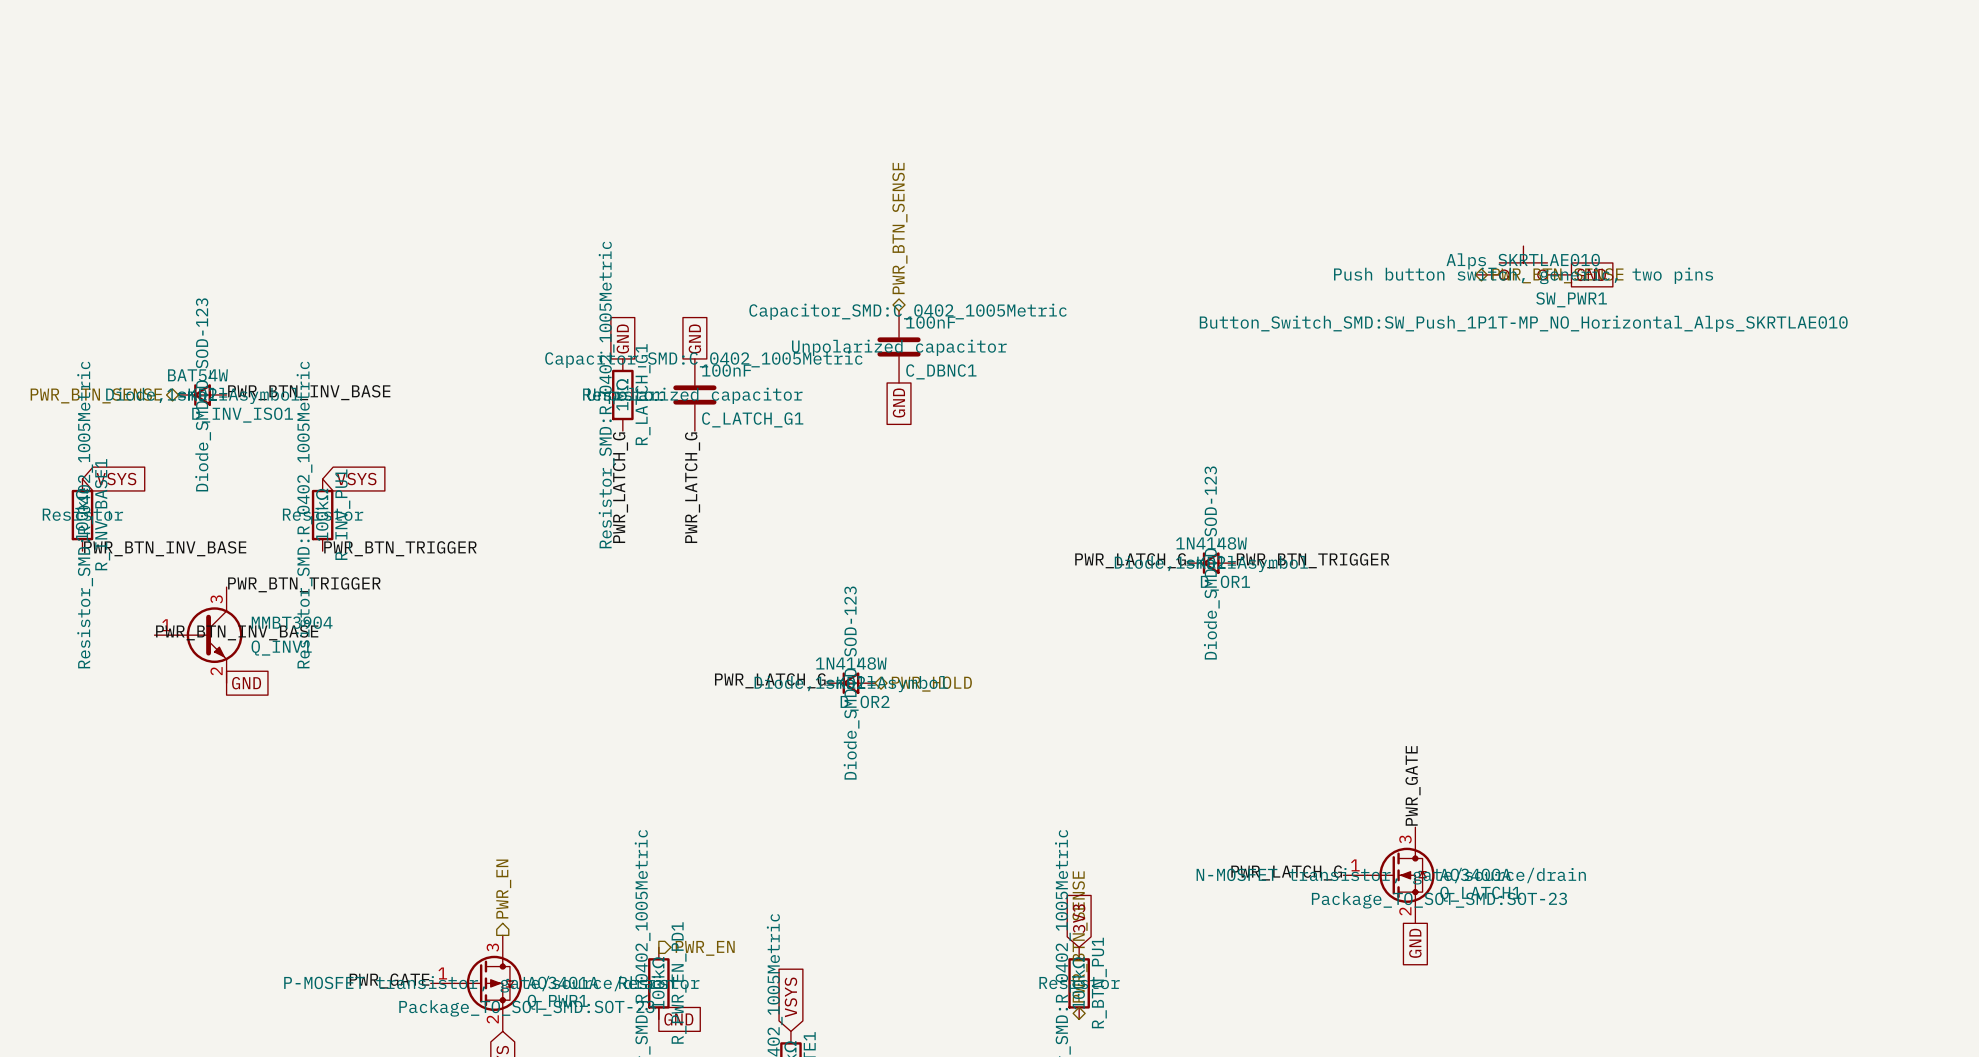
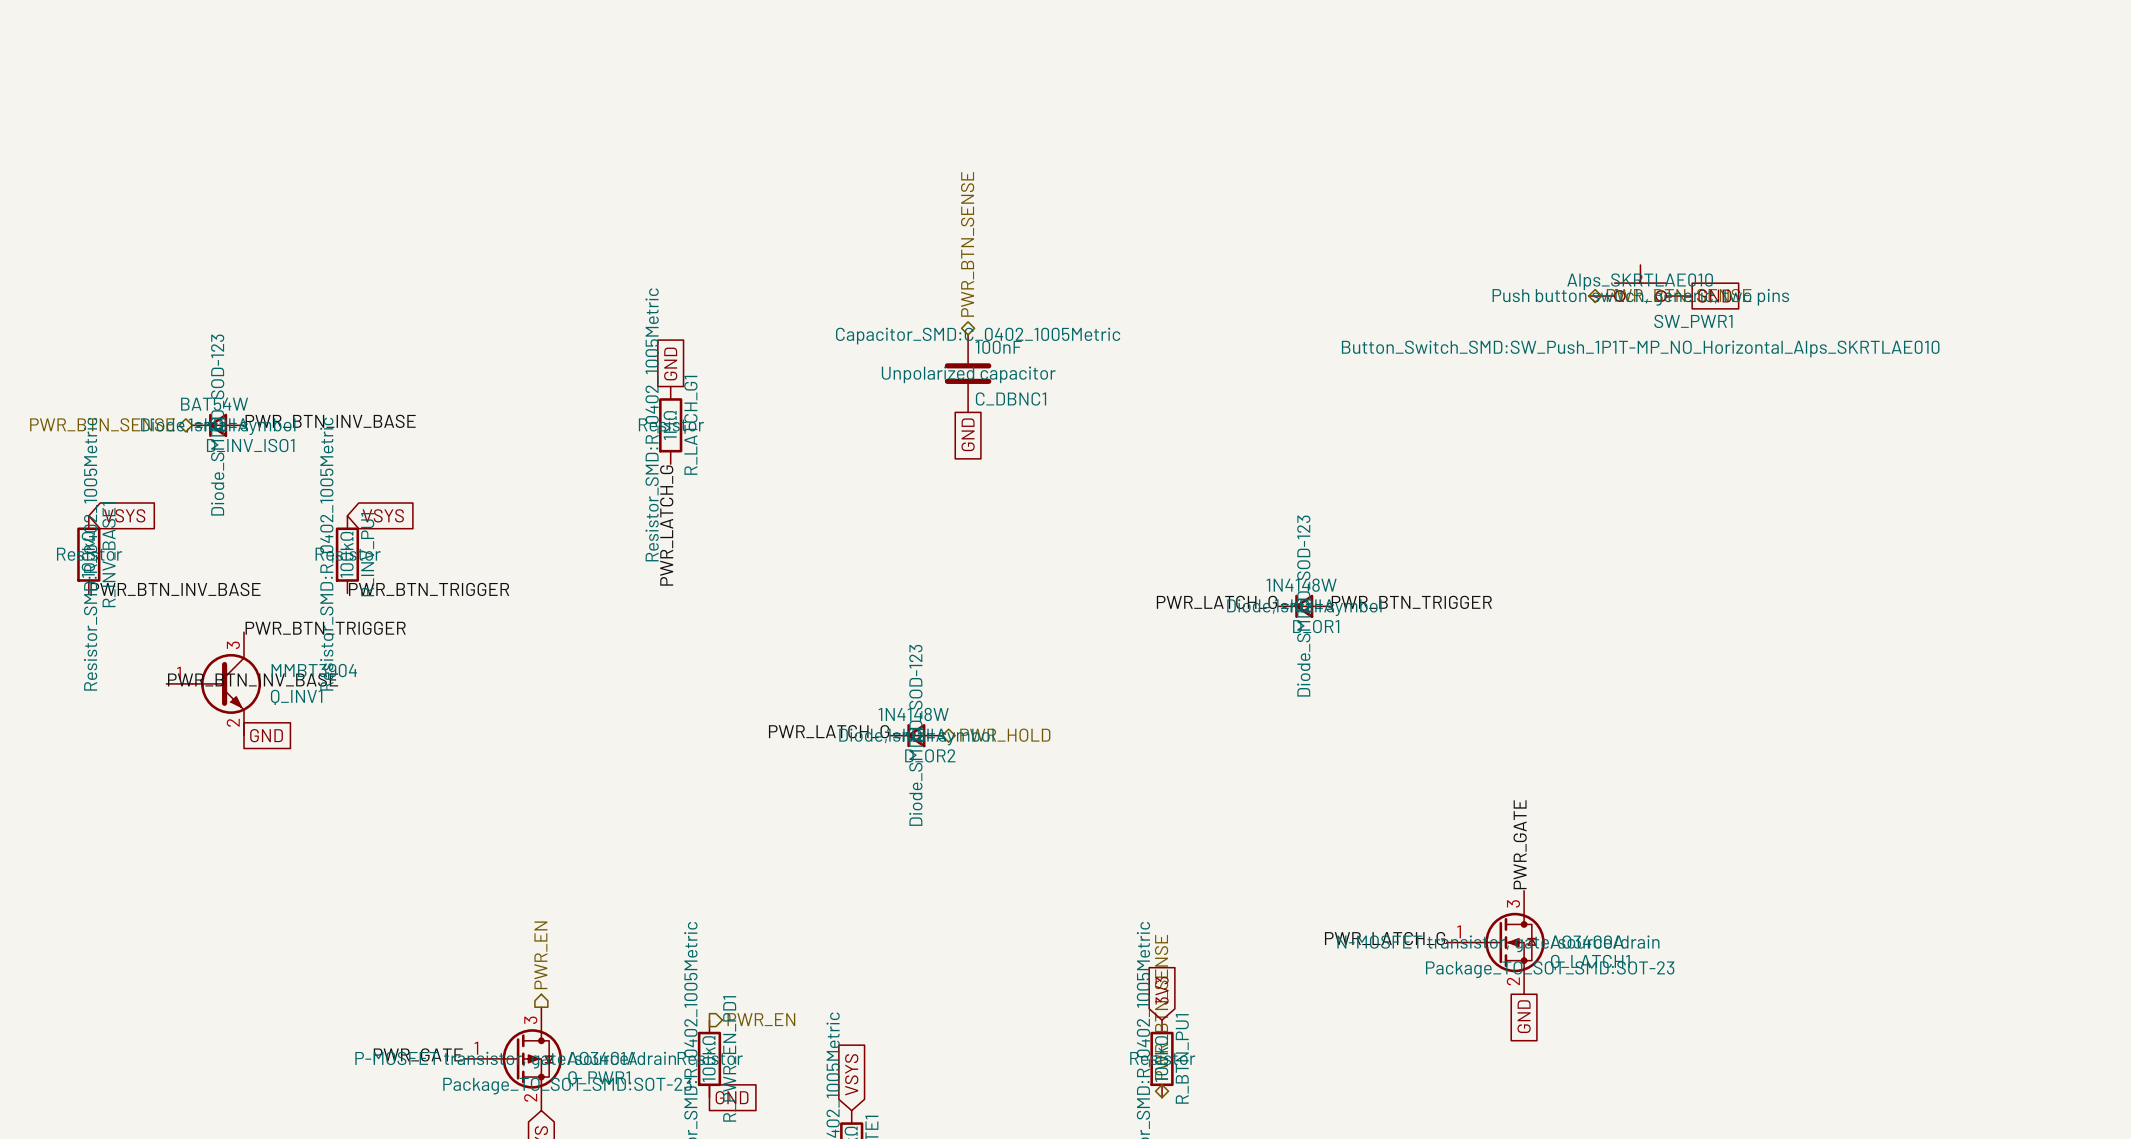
global label: GND (694, 338) -> none
C_LATCH_G1: 100nF (694, 394) -> none
label: PWR_LATCH_G (692, 487) -> none

